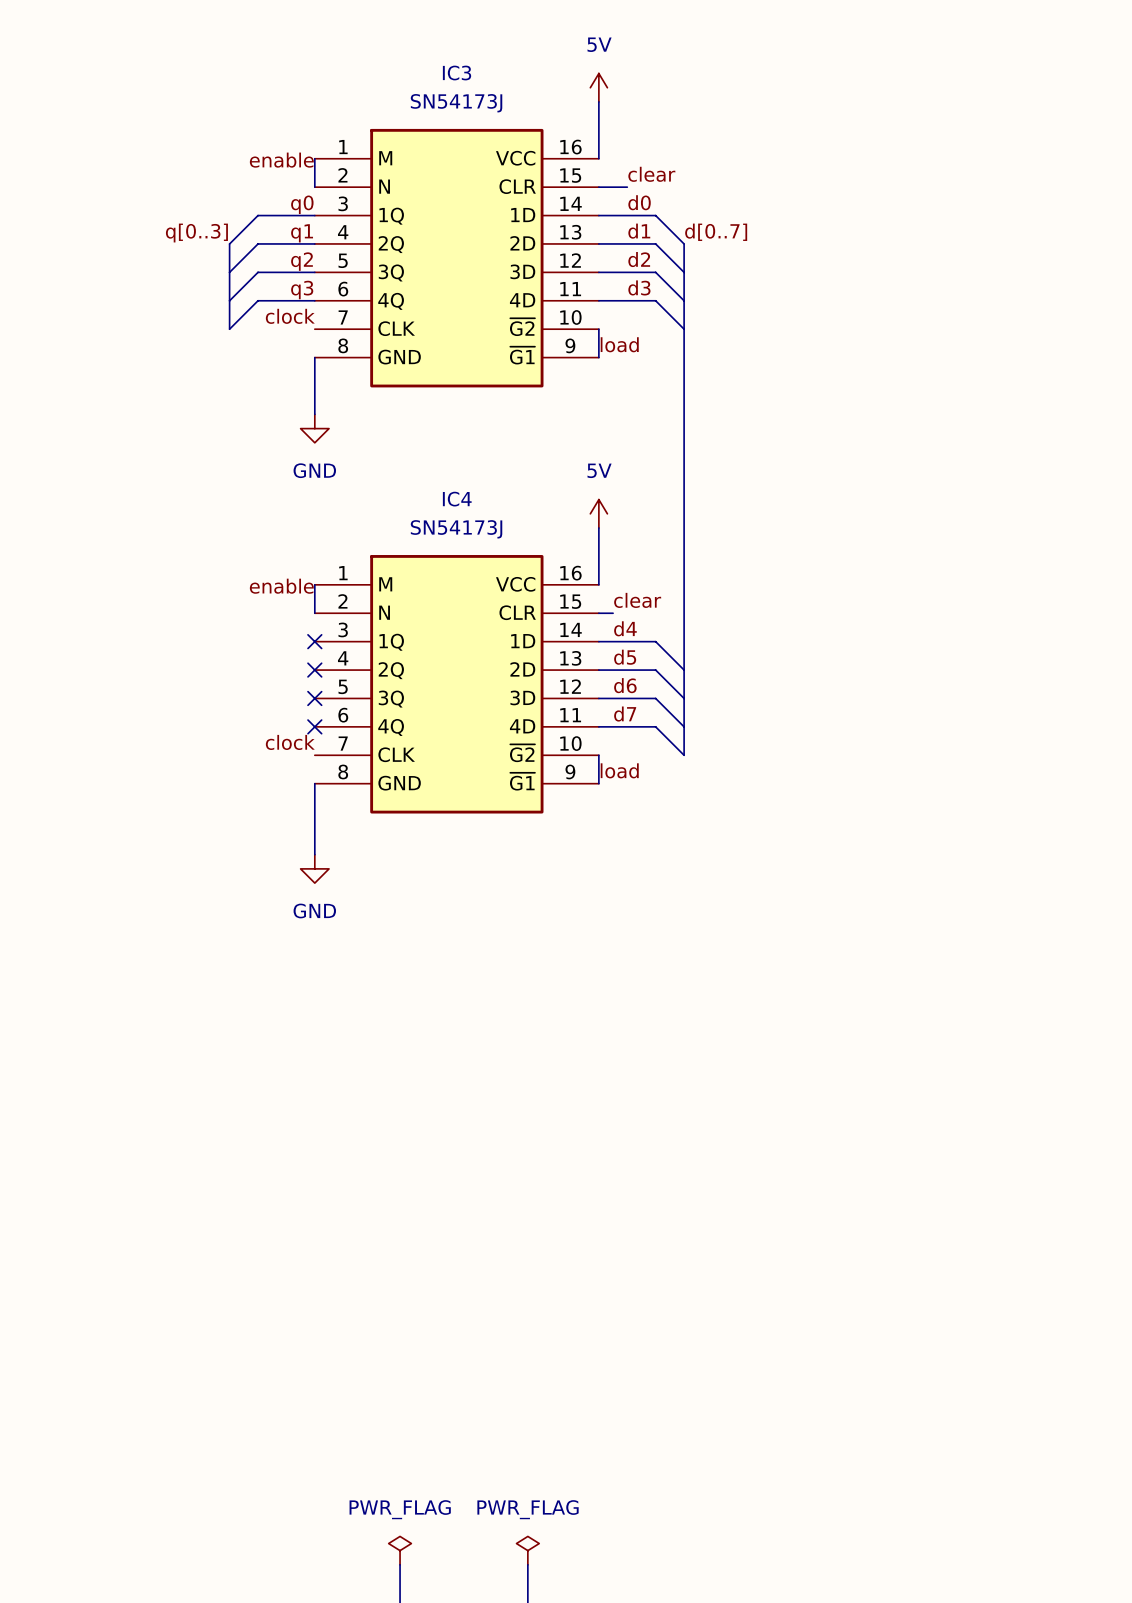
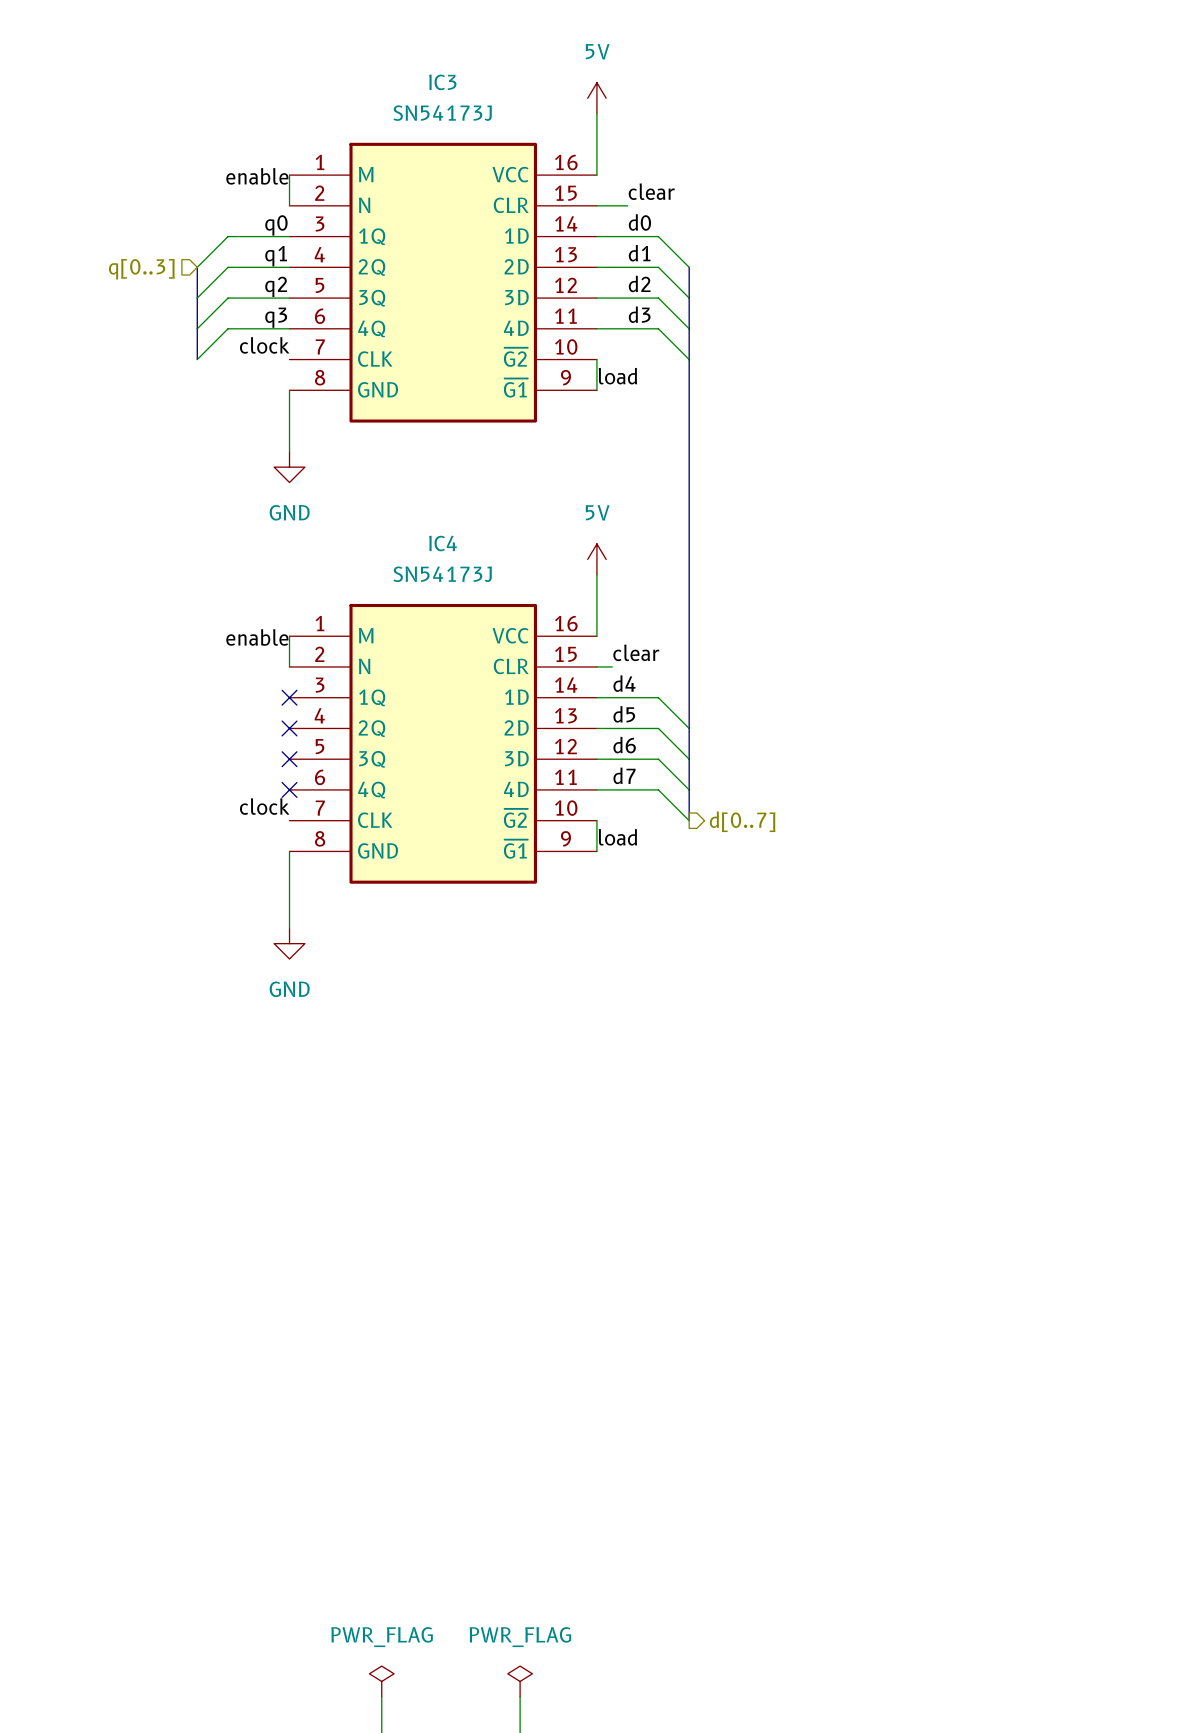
label: d[0..7] (716, 232) -> none
label: q[0..3] (196, 233) -> none
hierarchical label: none -> q[0..3] (141, 269)
hierarchical label: none -> d[0..7] (742, 821)

